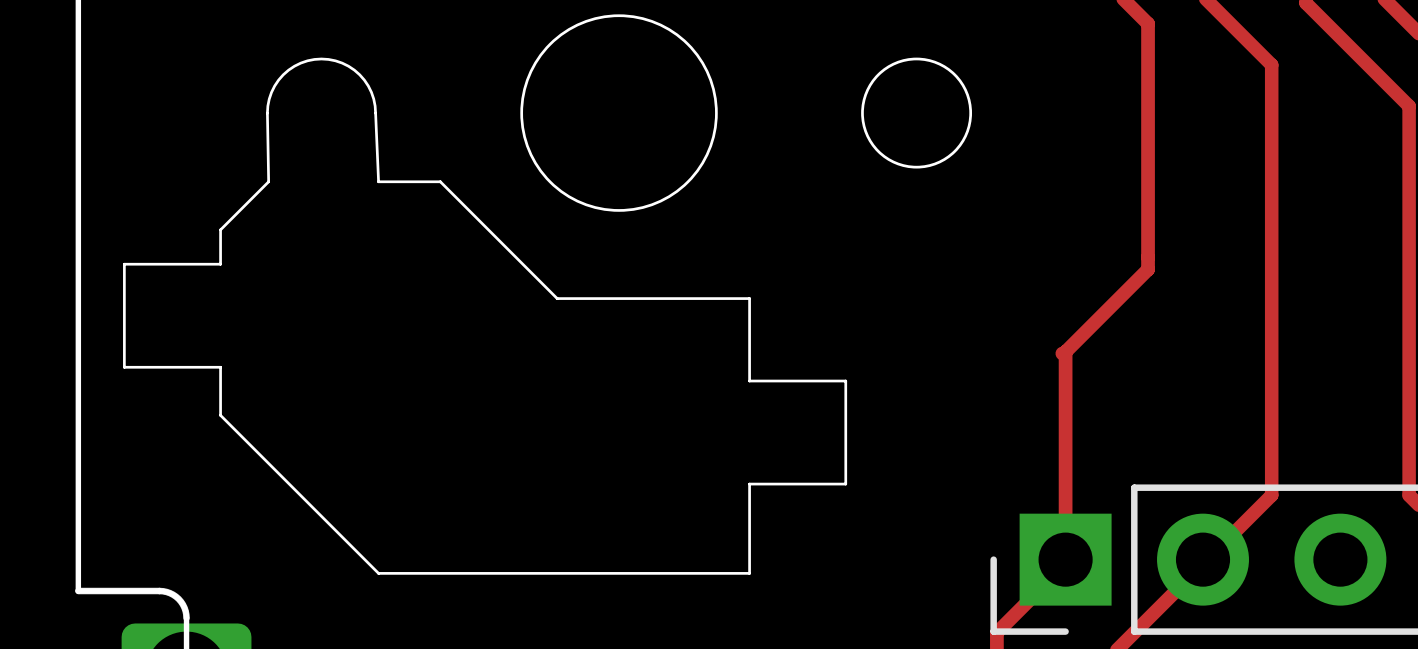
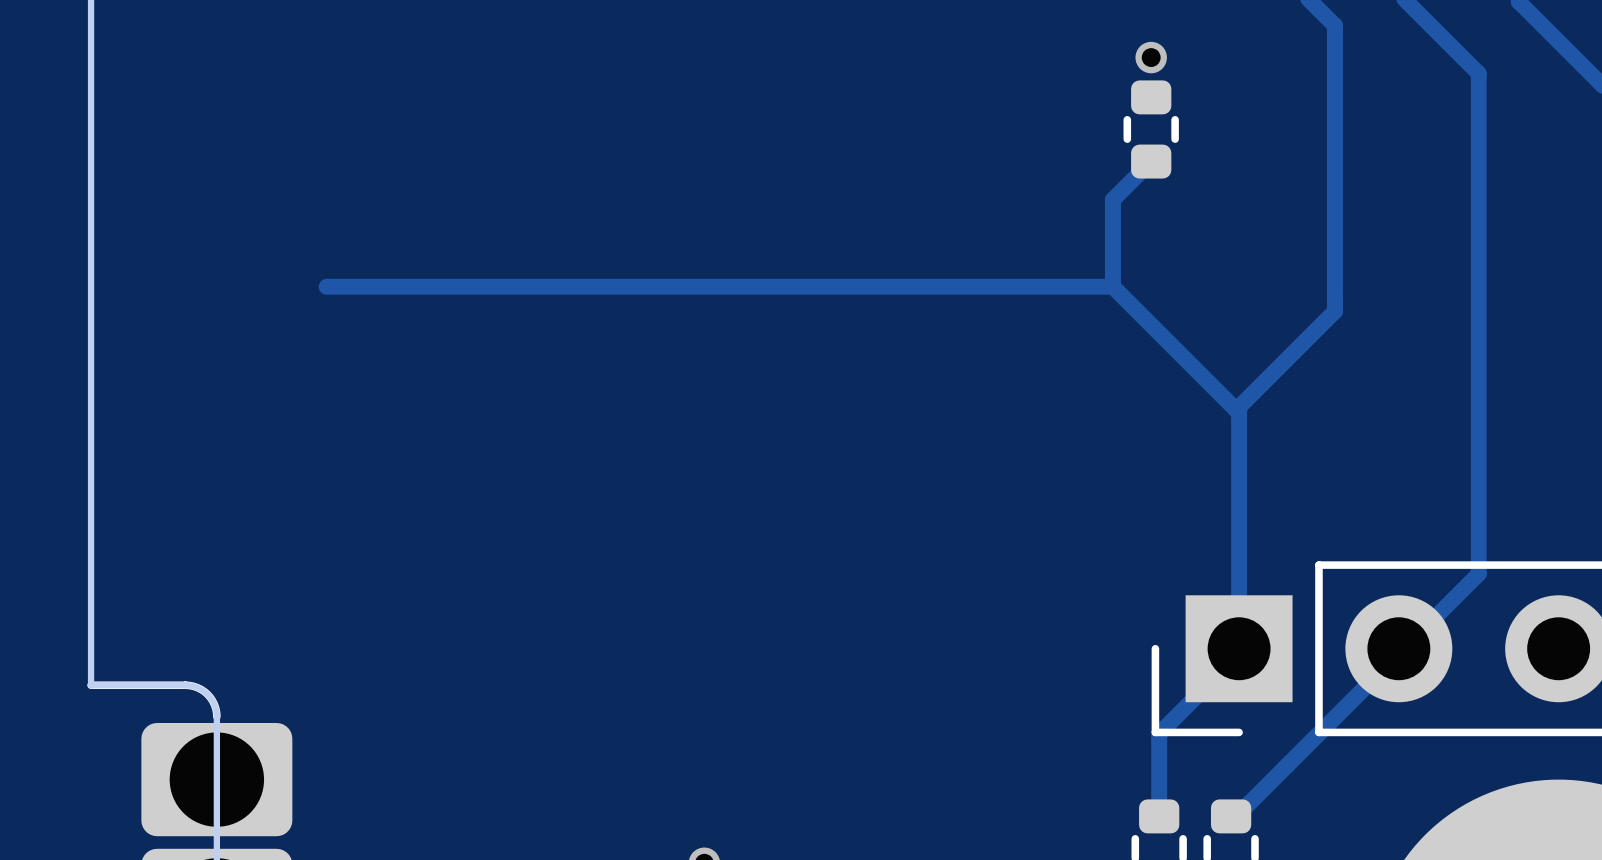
round board edge: [520, 14, 718, 212] -> none
via: none -> (1151, 57)
round board edge: [861, 57, 973, 169] -> none
board edge: (267, 113) (268, 181) (220, 229) (220, 264) (124, 264) (124, 367) (220, 367) (220, 415) (378, 573) (749, 573) (749, 484) (845, 484) (845, 381) (749, 381) (749, 298) (557, 298) (440, 181) (378, 181) (373, 99) (364, 80) (354, 70) (342, 63) (328, 59) (314, 59) (300, 63) (288, 70) (278, 80) (271, 92) (267, 113) -> none
part: none -> (1151, 129)
track: none -> (1151, 161) (1112, 199) (1112, 286)
track: none -> (326, 286) (1112, 286)
track: none -> (1112, 286) (1235, 409)

